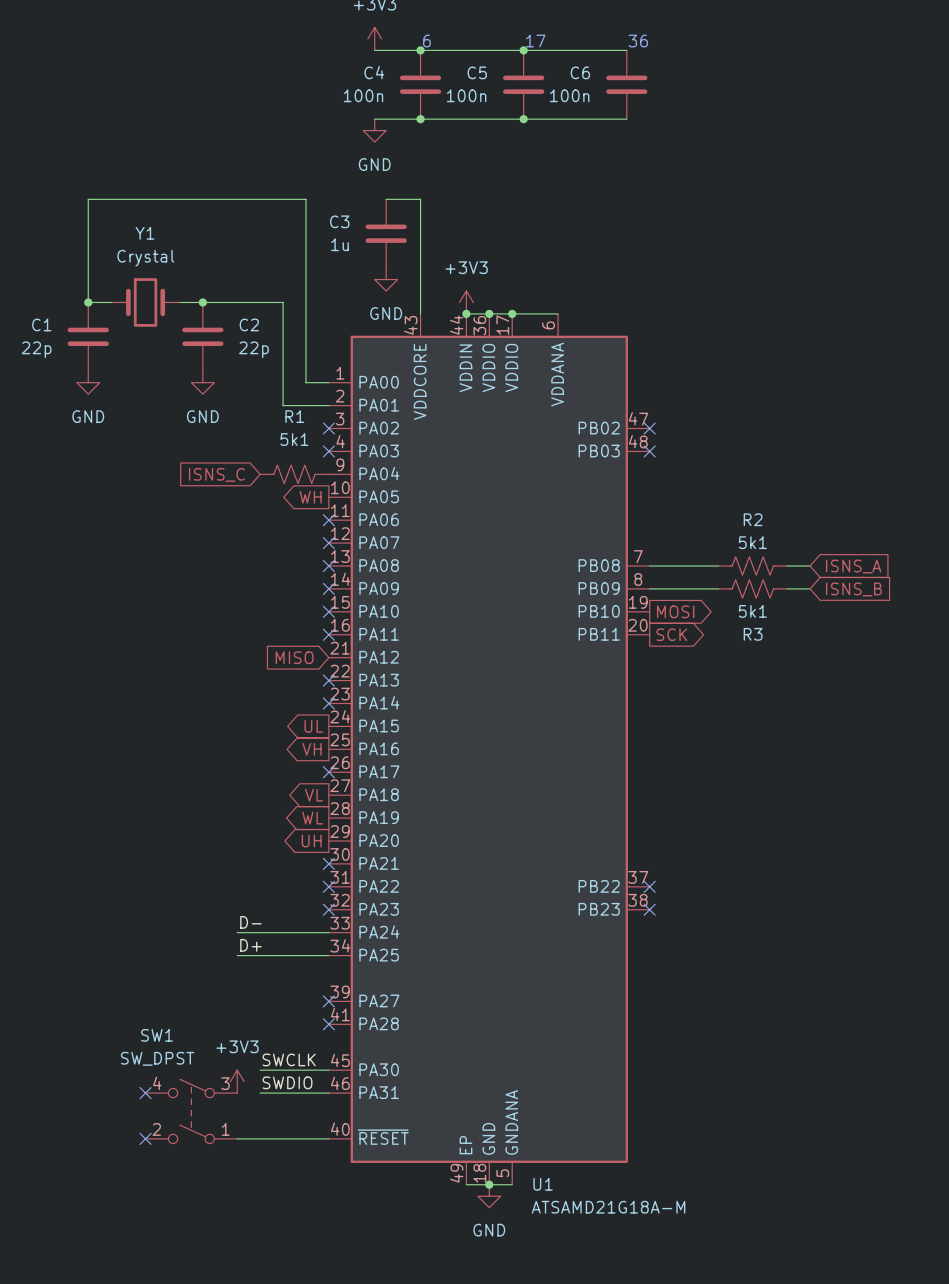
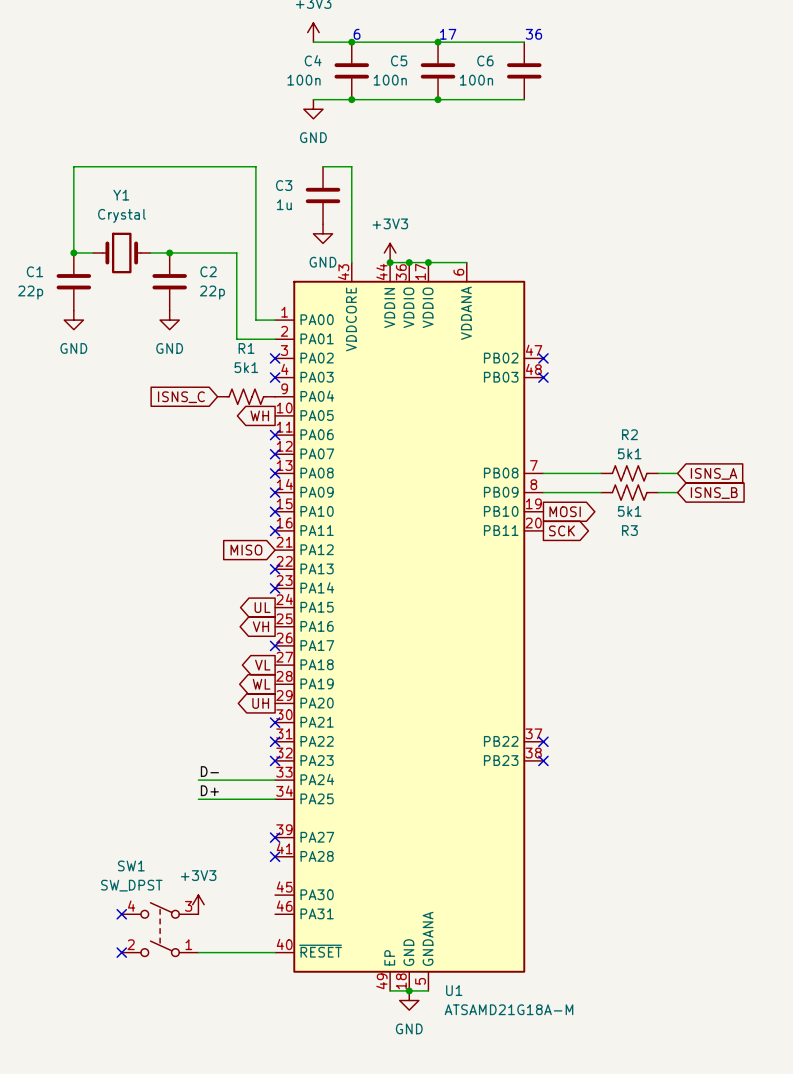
label: SWCLK (289, 1059) -> none
wire: (260, 1070) (328, 1070) -> none
label: SWDIO (287, 1082) -> none
wire: (260, 1093) (328, 1093) -> none

